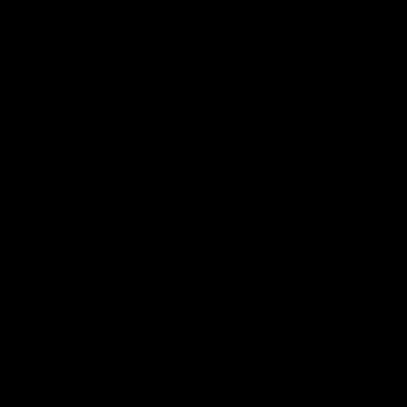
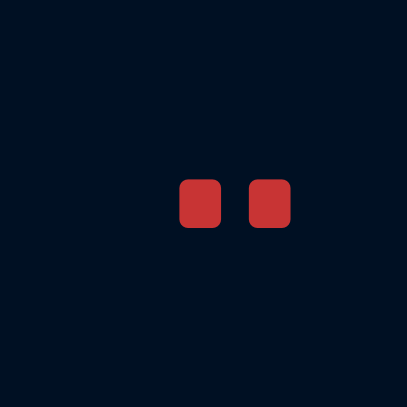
part: none -> (234, 203)

